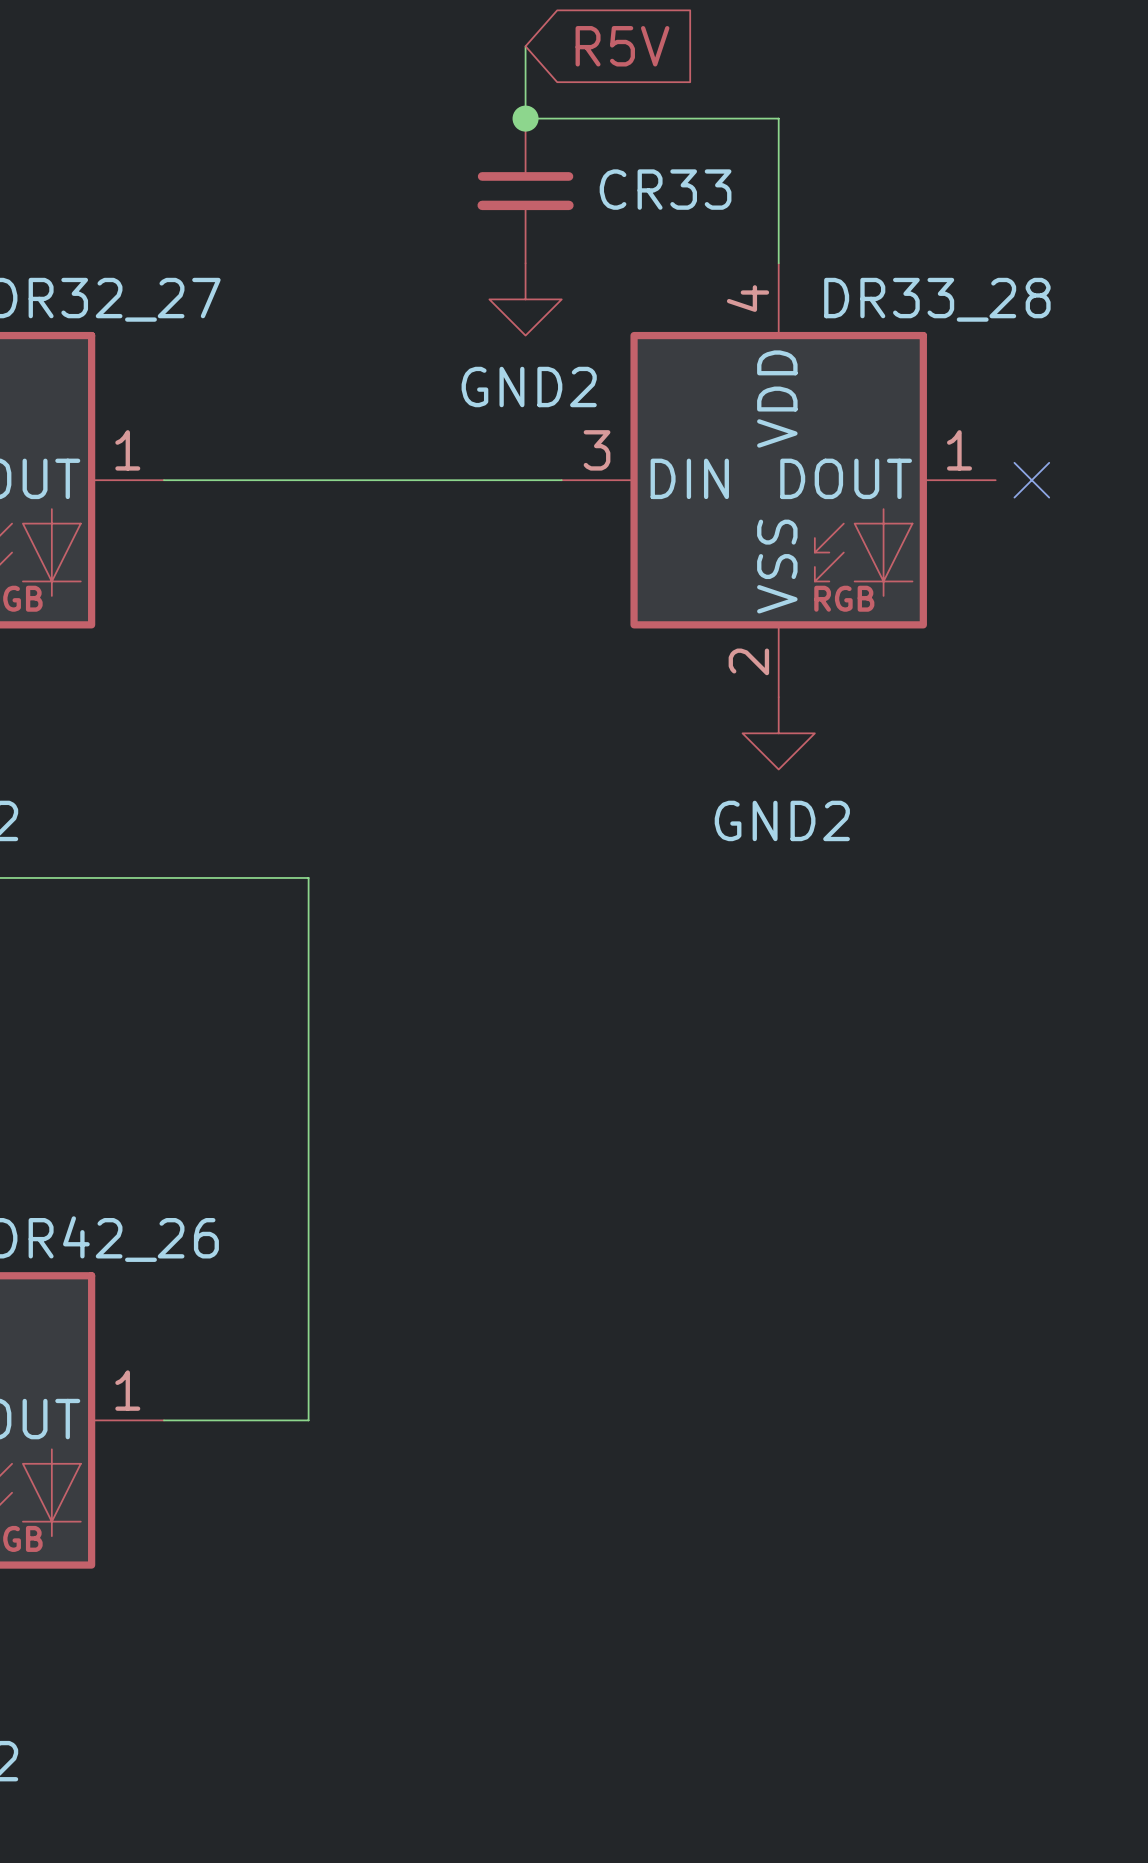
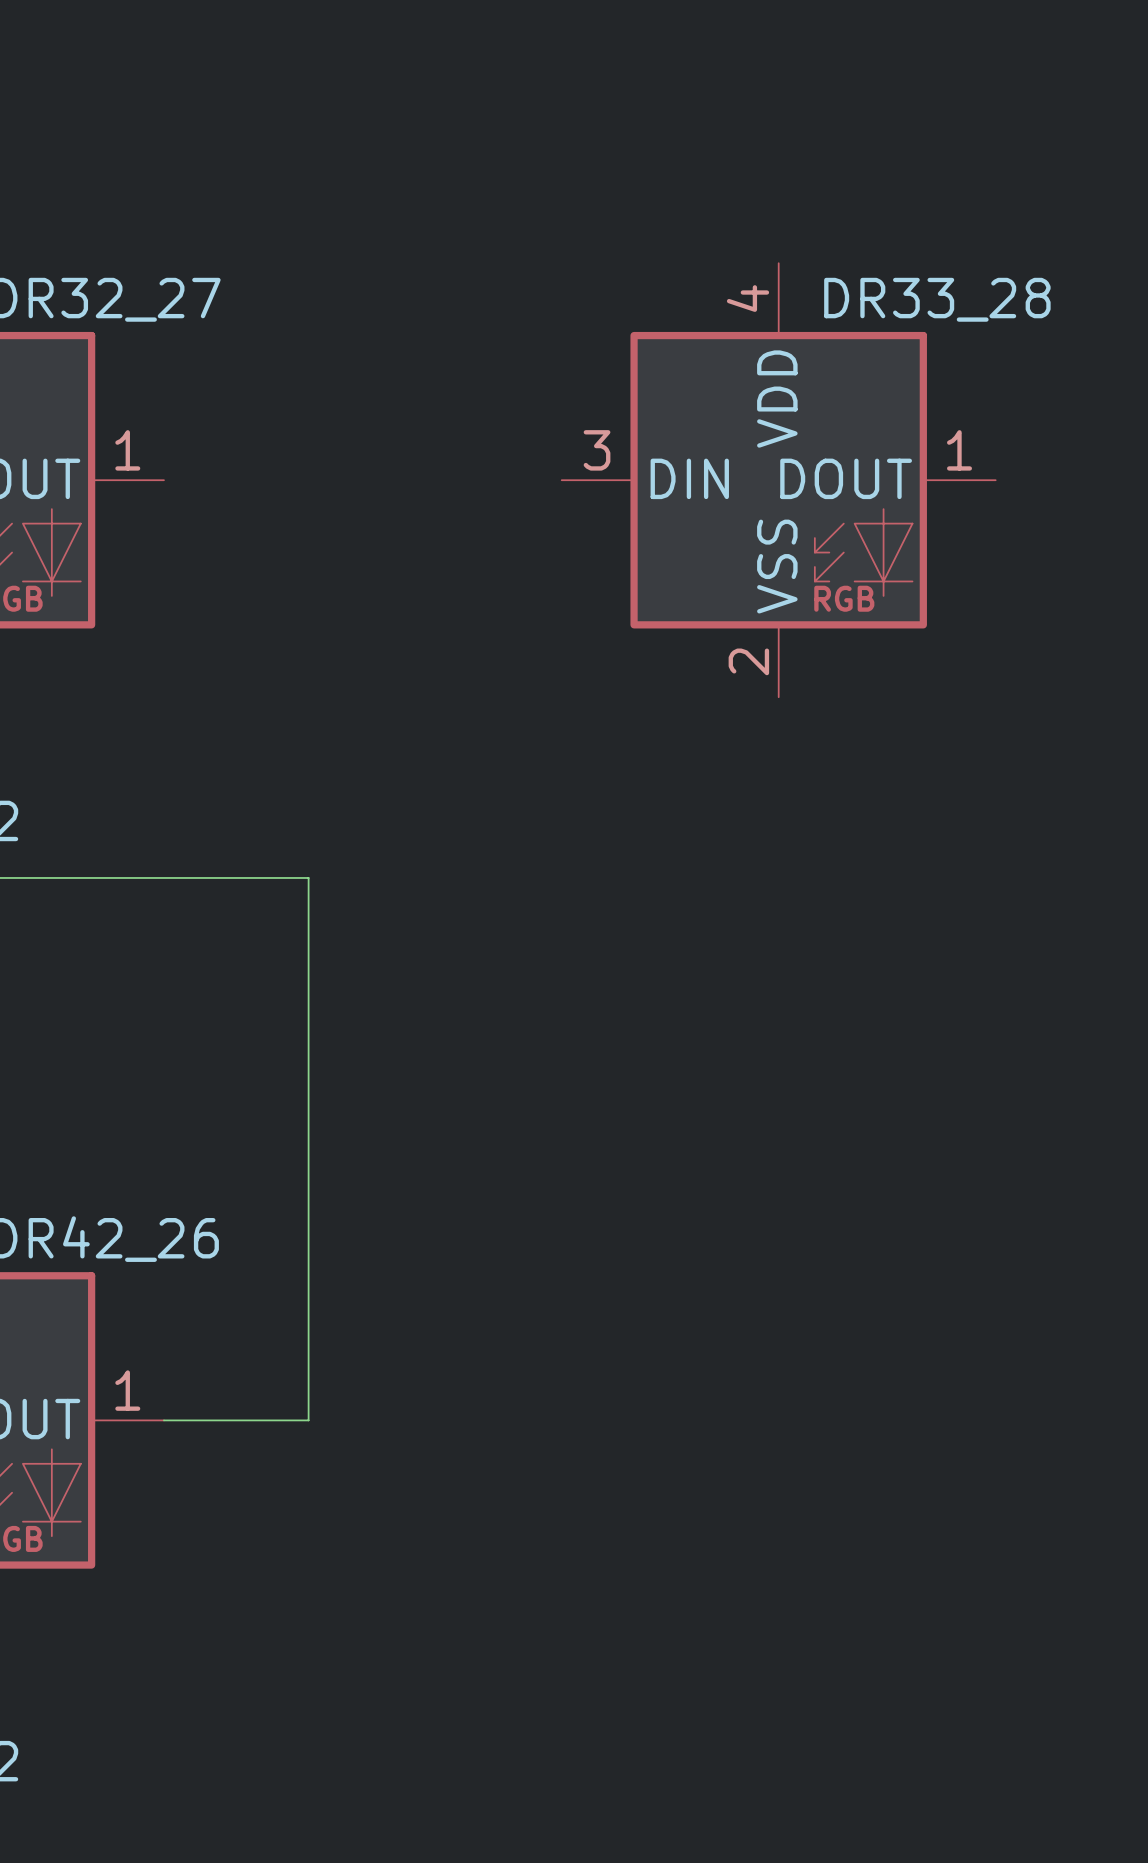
wire: (525, 46) (525, 118) (778, 118) (778, 263) -> none
global label: R5V (622, 46) -> none
junction: (525, 118) -> none
CR33: (525, 190) -> none
power symbol: GND2 (525, 299) -> none
wire: (163, 480) (561, 480) -> none
no-connect mark: (1031, 480) -> none
power symbol: GND2 (778, 733) -> none

